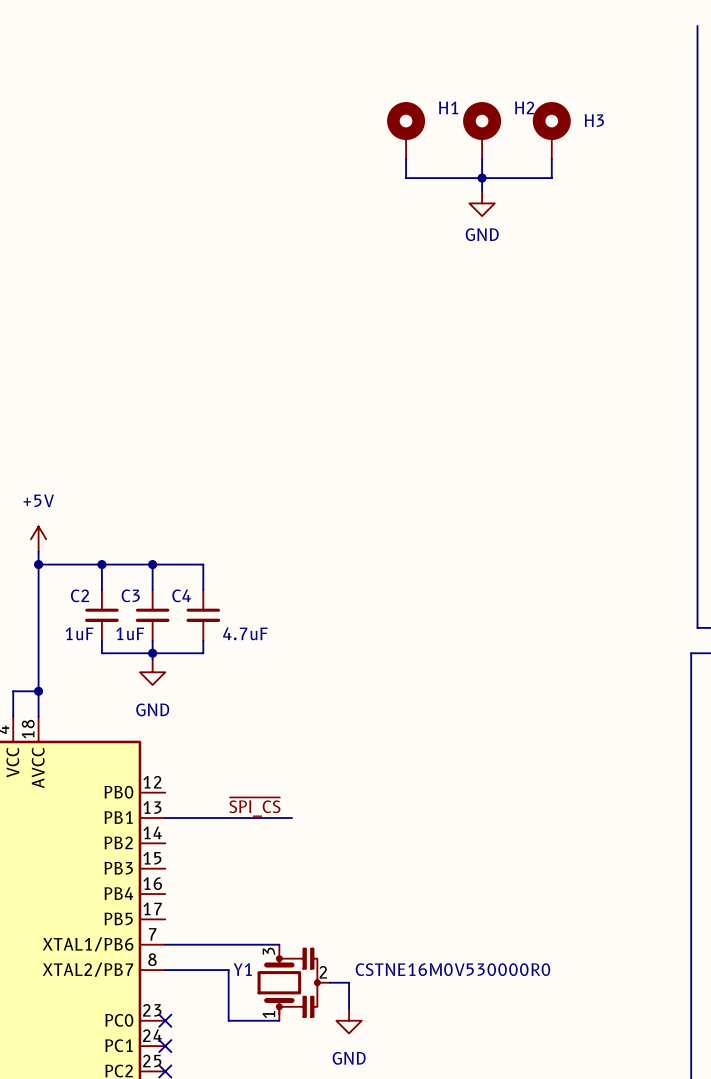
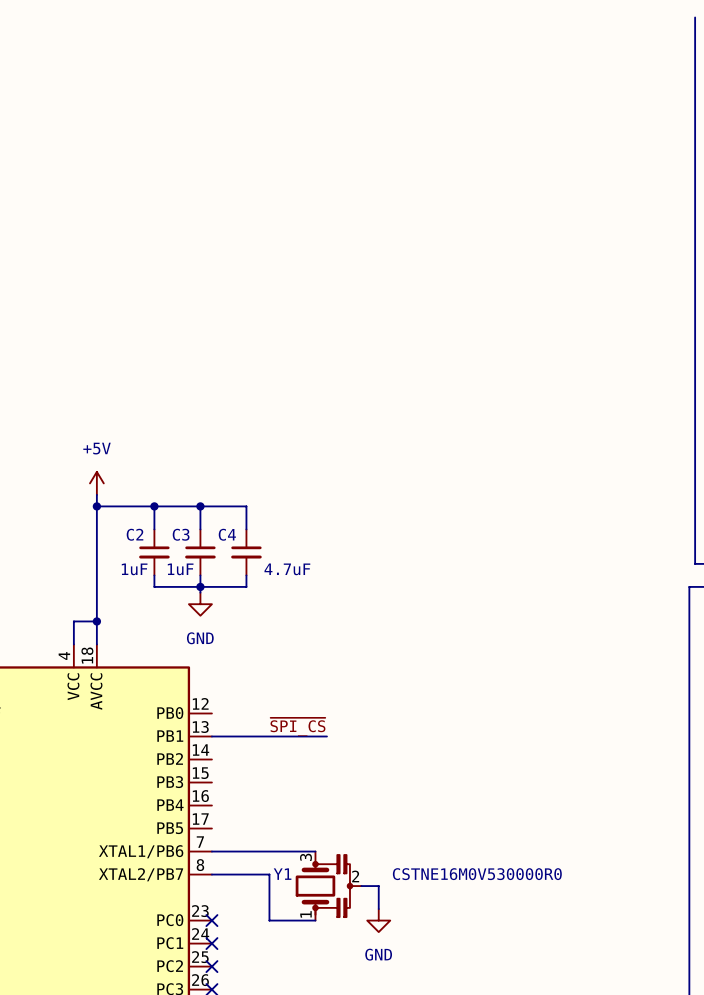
H1: (406, 130) -> none
H2: (482, 130) -> none
H3: (551, 130) -> none
wire: (406, 159) (406, 178) (551, 178) (551, 159) -> none
wire: (482, 159) (482, 190) -> none
junction: (482, 178) -> none
power symbol: GND (482, 203) -> none

